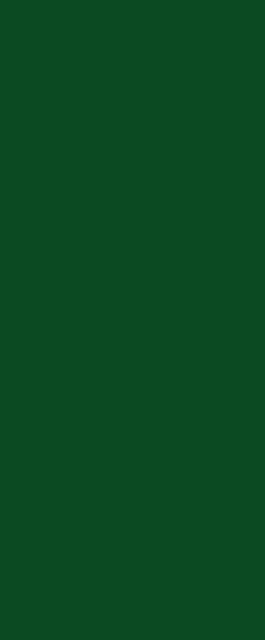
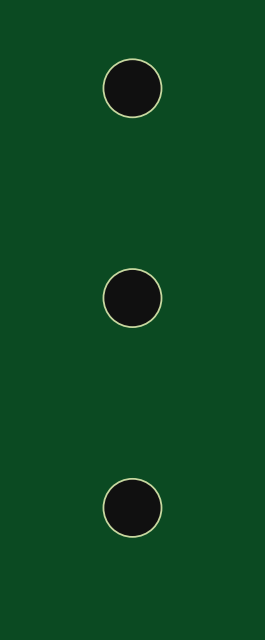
part: none -> (132, 88)
part: none -> (132, 298)
part: none -> (132, 507)

